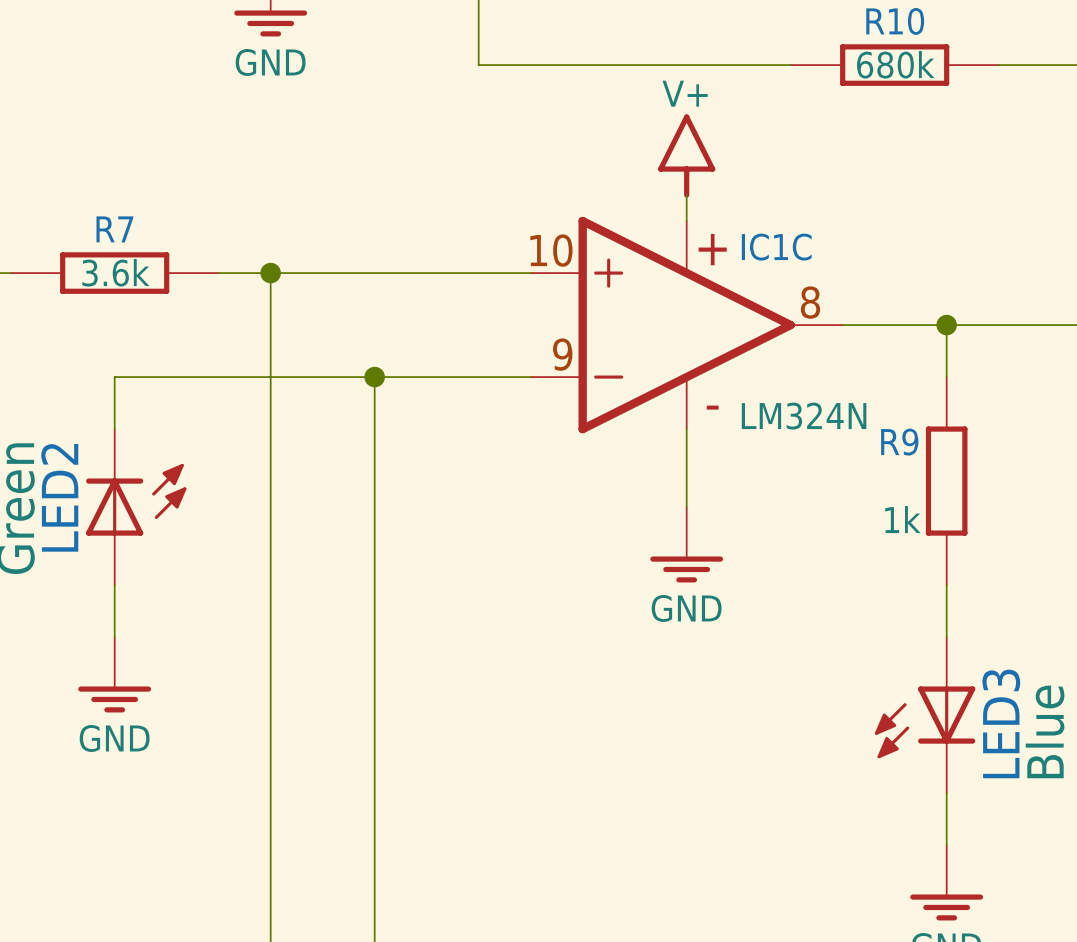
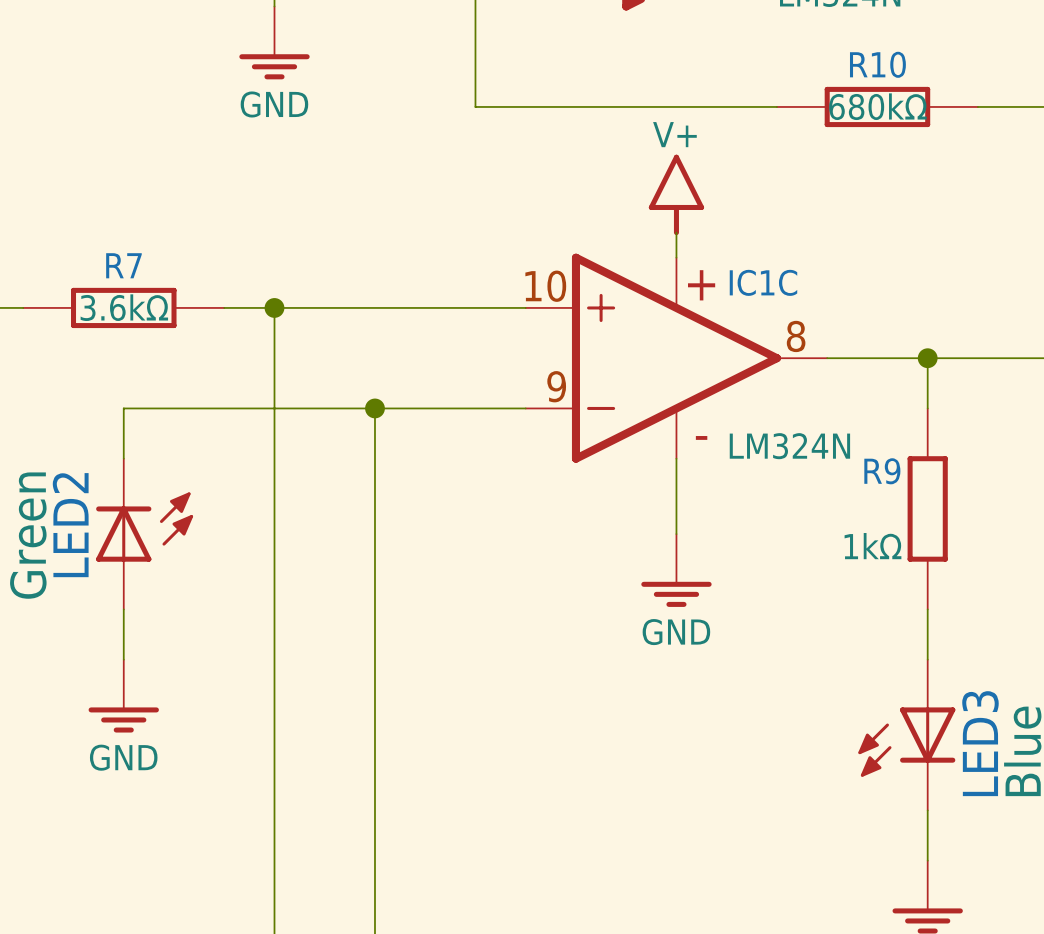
R10 value: 680k (895, 64) -> 680kΩ (877, 106)
R7 value: 3.6k (115, 272) -> 3.6kΩ (124, 307)
R9 value: 1k (902, 519) -> 1kΩ (872, 546)

